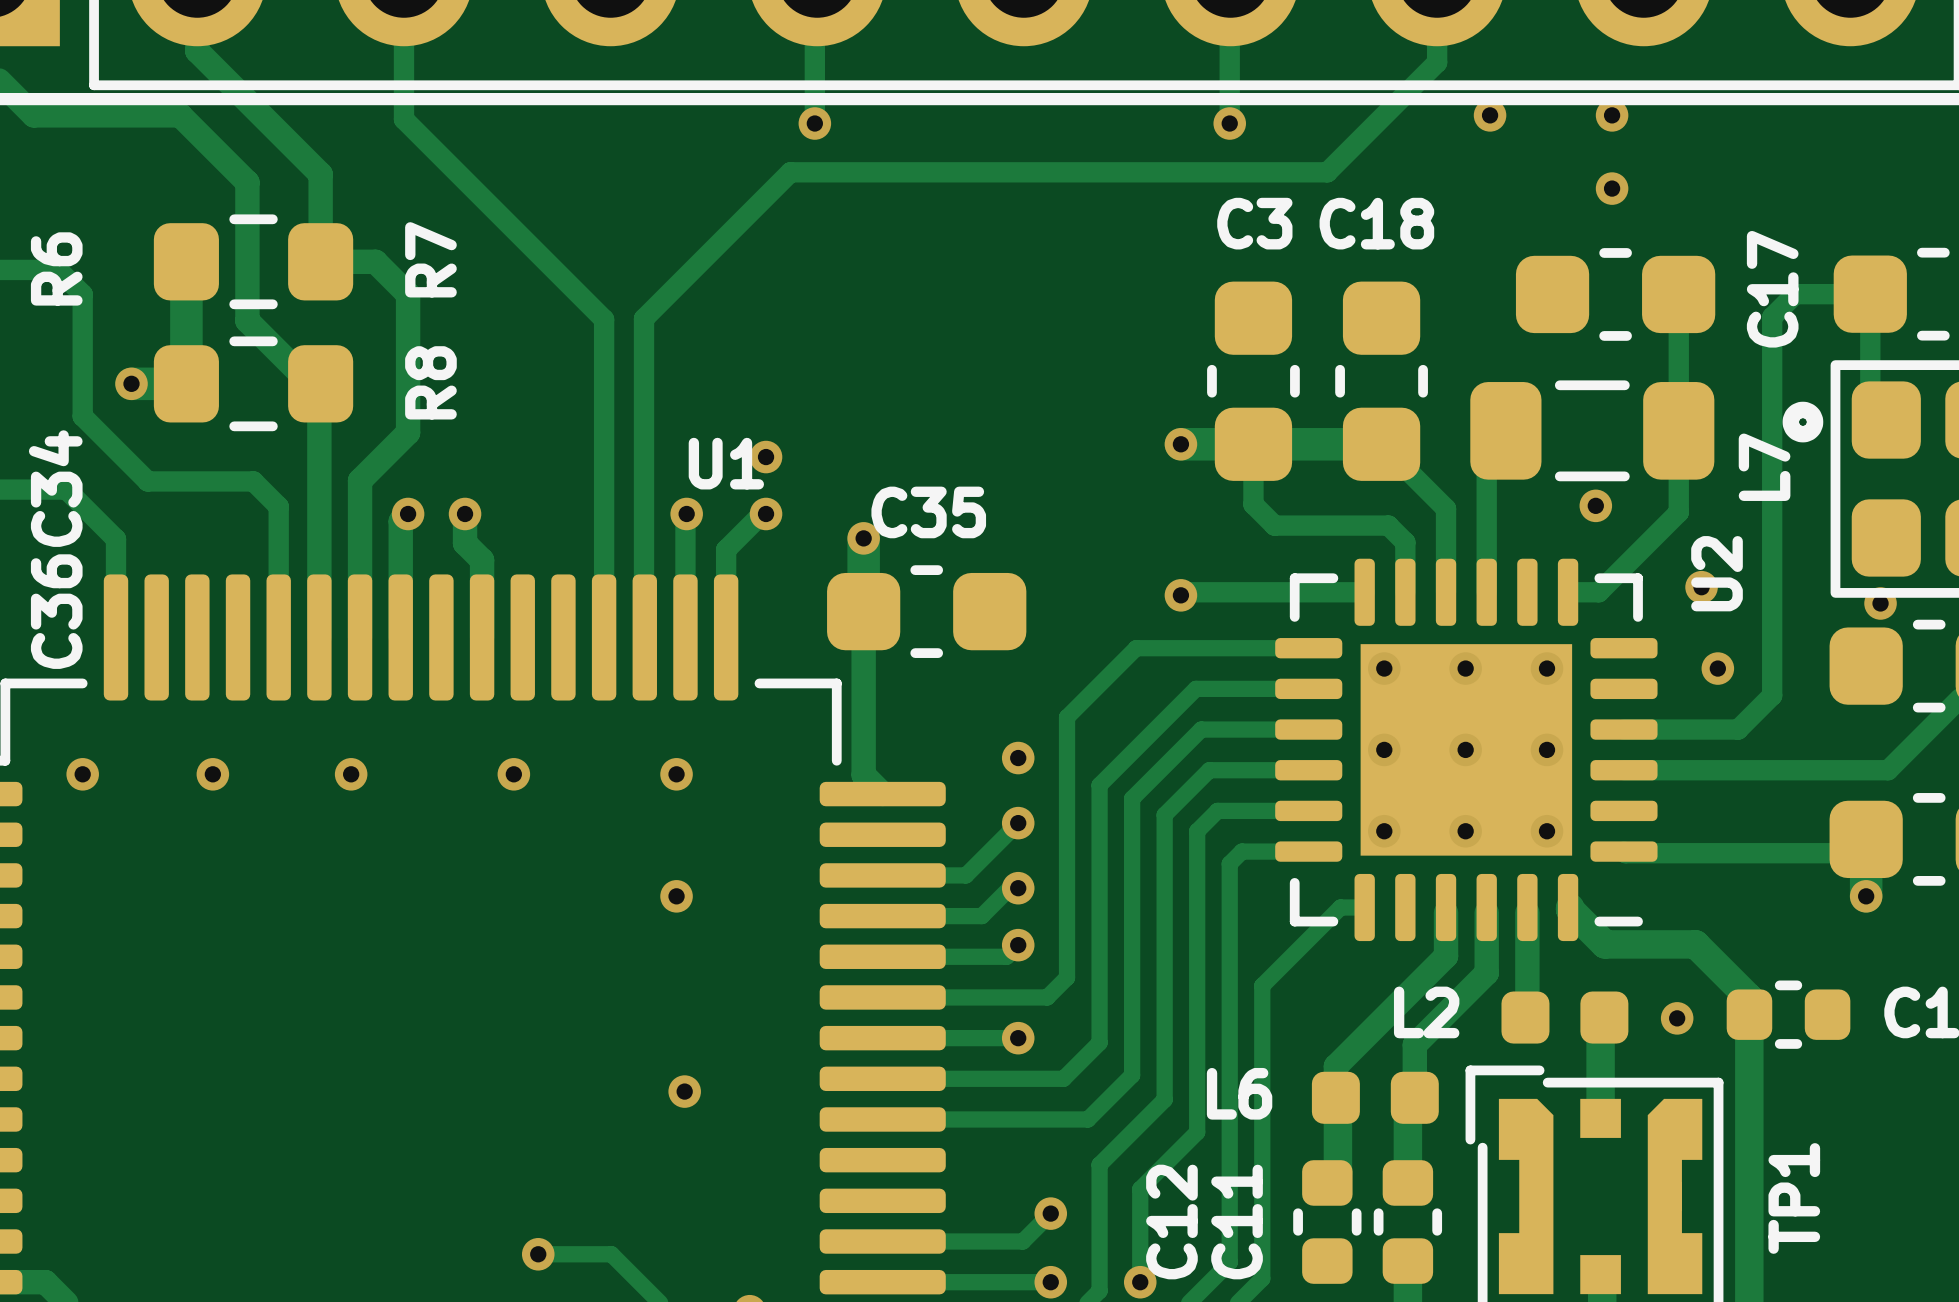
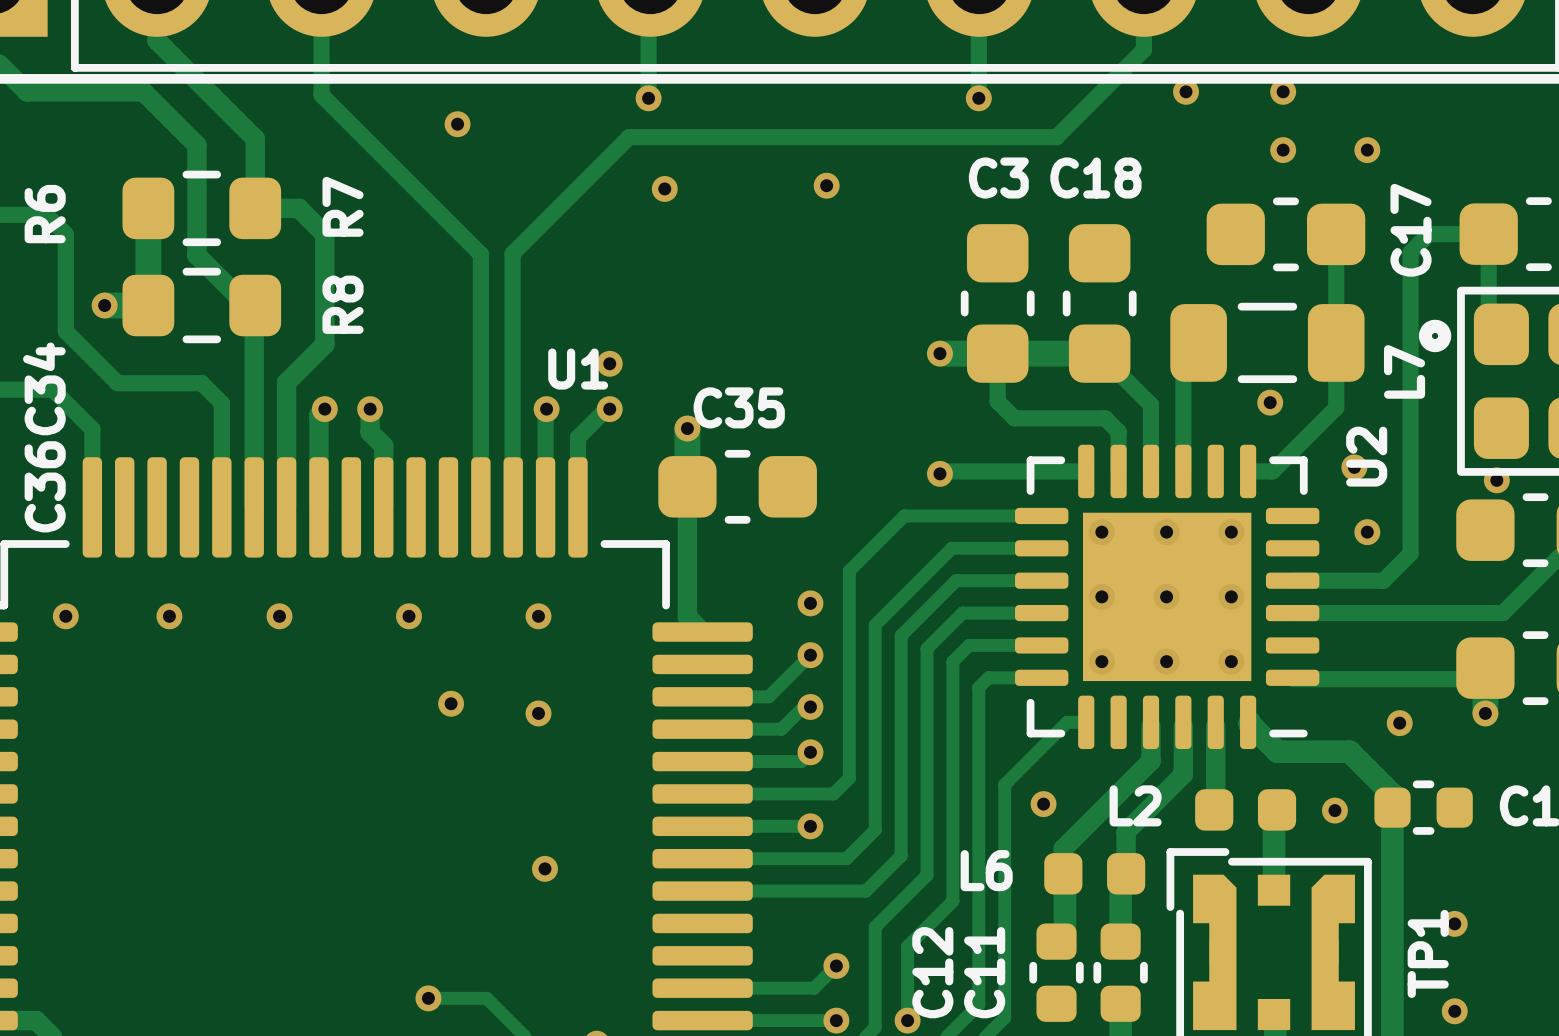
via: none -> (457, 124)
via: none -> (1367, 150)
via: none -> (826, 185)
via: none -> (664, 188)
via: none -> (451, 703)
via: none -> (1399, 723)
via: none -> (1043, 804)
via: none -> (1454, 923)
via: none -> (1454, 1011)

